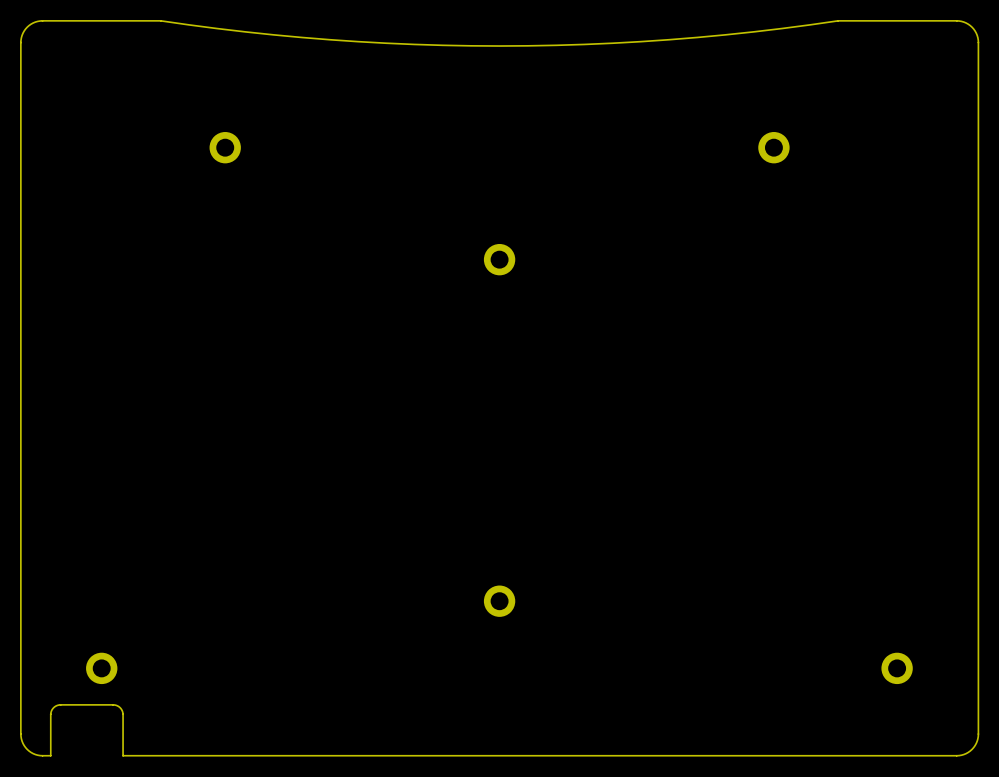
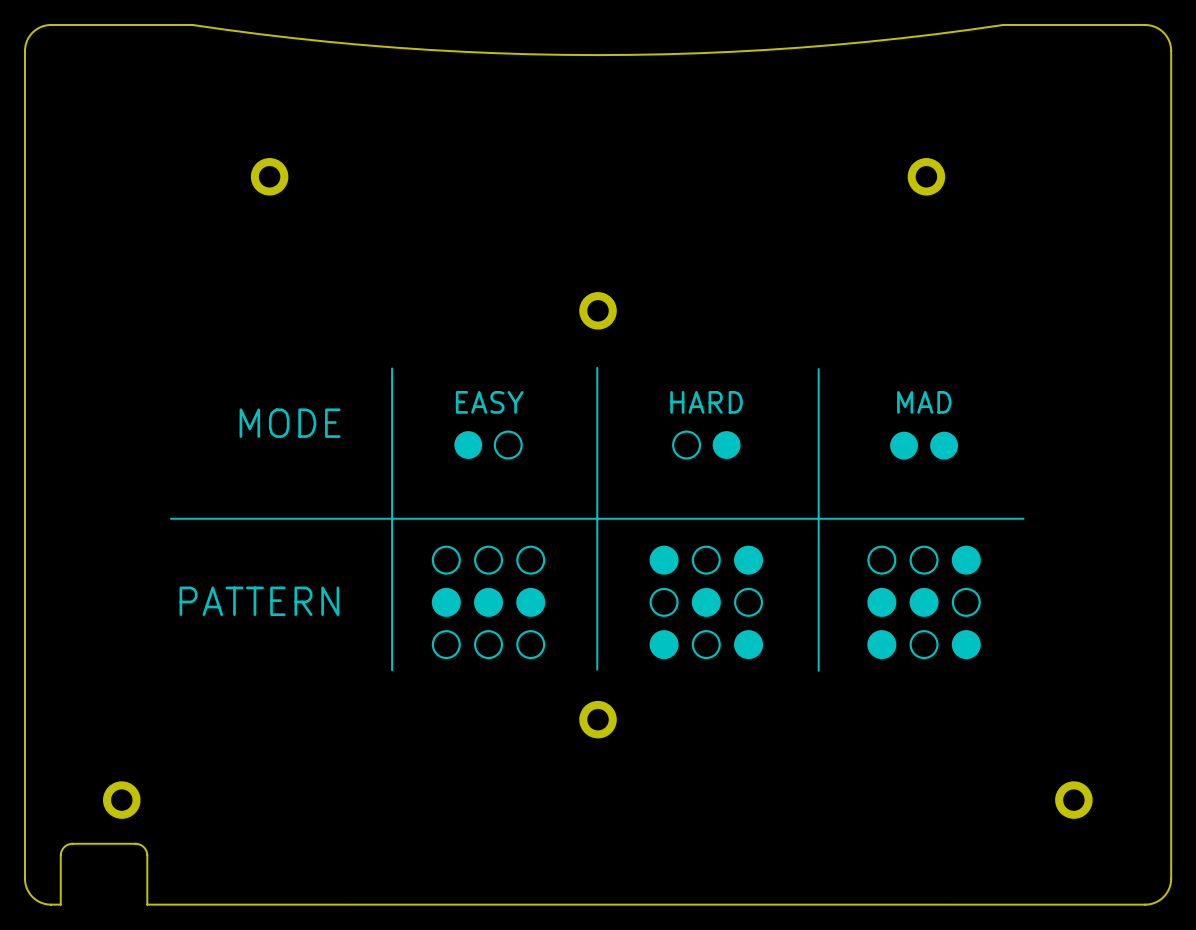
line: none -> (392, 368) (392, 670)
line: none -> (597, 367) (597, 669)
line: none -> (818, 369) (818, 670)
text: none -> EASY (489, 402)
text: none -> HARD (706, 402)
text: none -> MAD (924, 402)
text: none -> MODE (290, 423)
drawing: none -> [493, 430, 523, 460]
drawing: none -> [672, 430, 702, 460]
drawing: none -> [454, 431, 483, 459]
drawing: none -> [712, 431, 741, 459]
drawing: none -> [890, 431, 918, 460]
drawing: none -> [930, 431, 958, 460]
line: none -> (1023, 518) (170, 518)
drawing: none -> [431, 545, 461, 575]
drawing: none -> [474, 545, 504, 575]
drawing: none -> [516, 545, 546, 575]
drawing: none -> [649, 545, 679, 575]
drawing: none -> [691, 545, 721, 575]
drawing: none -> [734, 545, 764, 575]
drawing: none -> [867, 545, 897, 575]
drawing: none -> [909, 545, 939, 575]
drawing: none -> [951, 545, 981, 575]
drawing: none -> [431, 587, 461, 617]
drawing: none -> [474, 587, 504, 617]
drawing: none -> [516, 587, 546, 617]
drawing: none -> [649, 587, 679, 617]
drawing: none -> [691, 587, 721, 617]
drawing: none -> [734, 587, 764, 617]
drawing: none -> [867, 587, 897, 617]
drawing: none -> [909, 587, 939, 617]
drawing: none -> [951, 587, 981, 617]
text: none -> PATTERN (259, 601)
drawing: none -> [431, 630, 461, 660]
drawing: none -> [474, 630, 504, 660]
drawing: none -> [516, 630, 546, 660]
drawing: none -> [649, 630, 679, 660]
drawing: none -> [691, 630, 721, 660]
drawing: none -> [734, 630, 764, 660]
drawing: none -> [867, 630, 897, 660]
drawing: none -> [909, 630, 939, 660]
drawing: none -> [951, 630, 981, 660]

